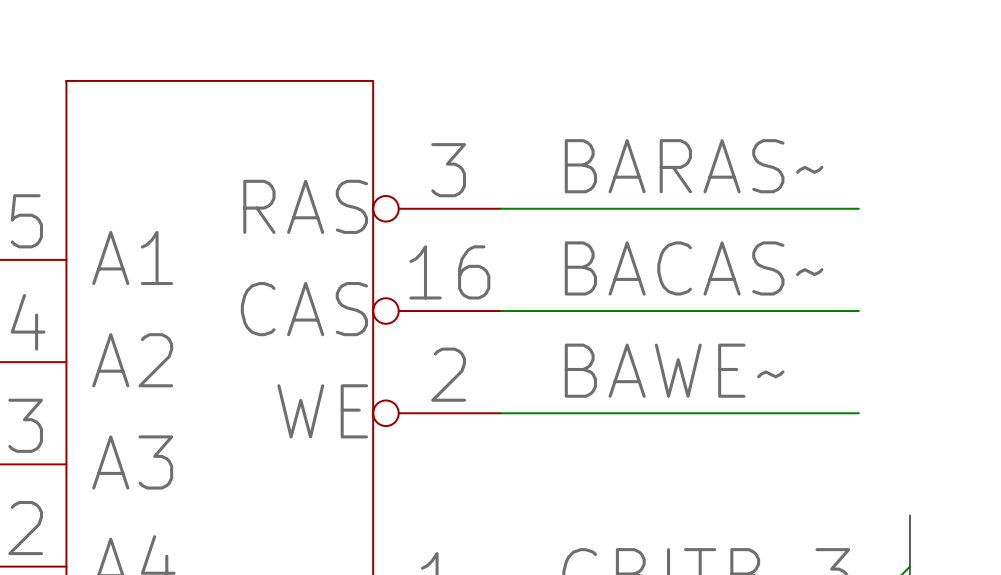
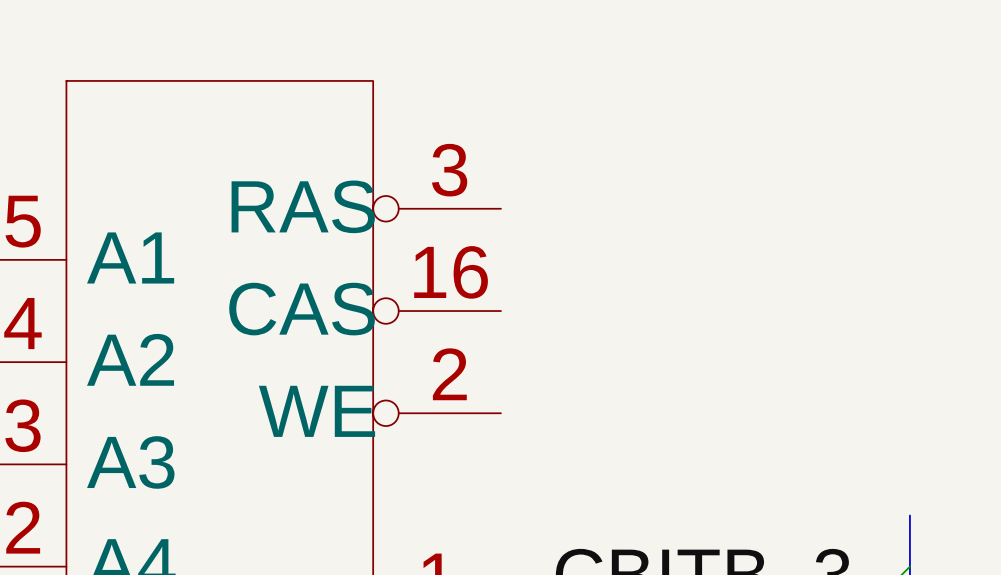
label: BARAS~ (694, 166) -> none
wire: (500, 208) (858, 208) -> none
label: BACAS~ (694, 268) -> none
wire: (500, 311) (858, 311) -> none
label: BAWE~ (674, 370) -> none
wire: (500, 413) (858, 413) -> none

